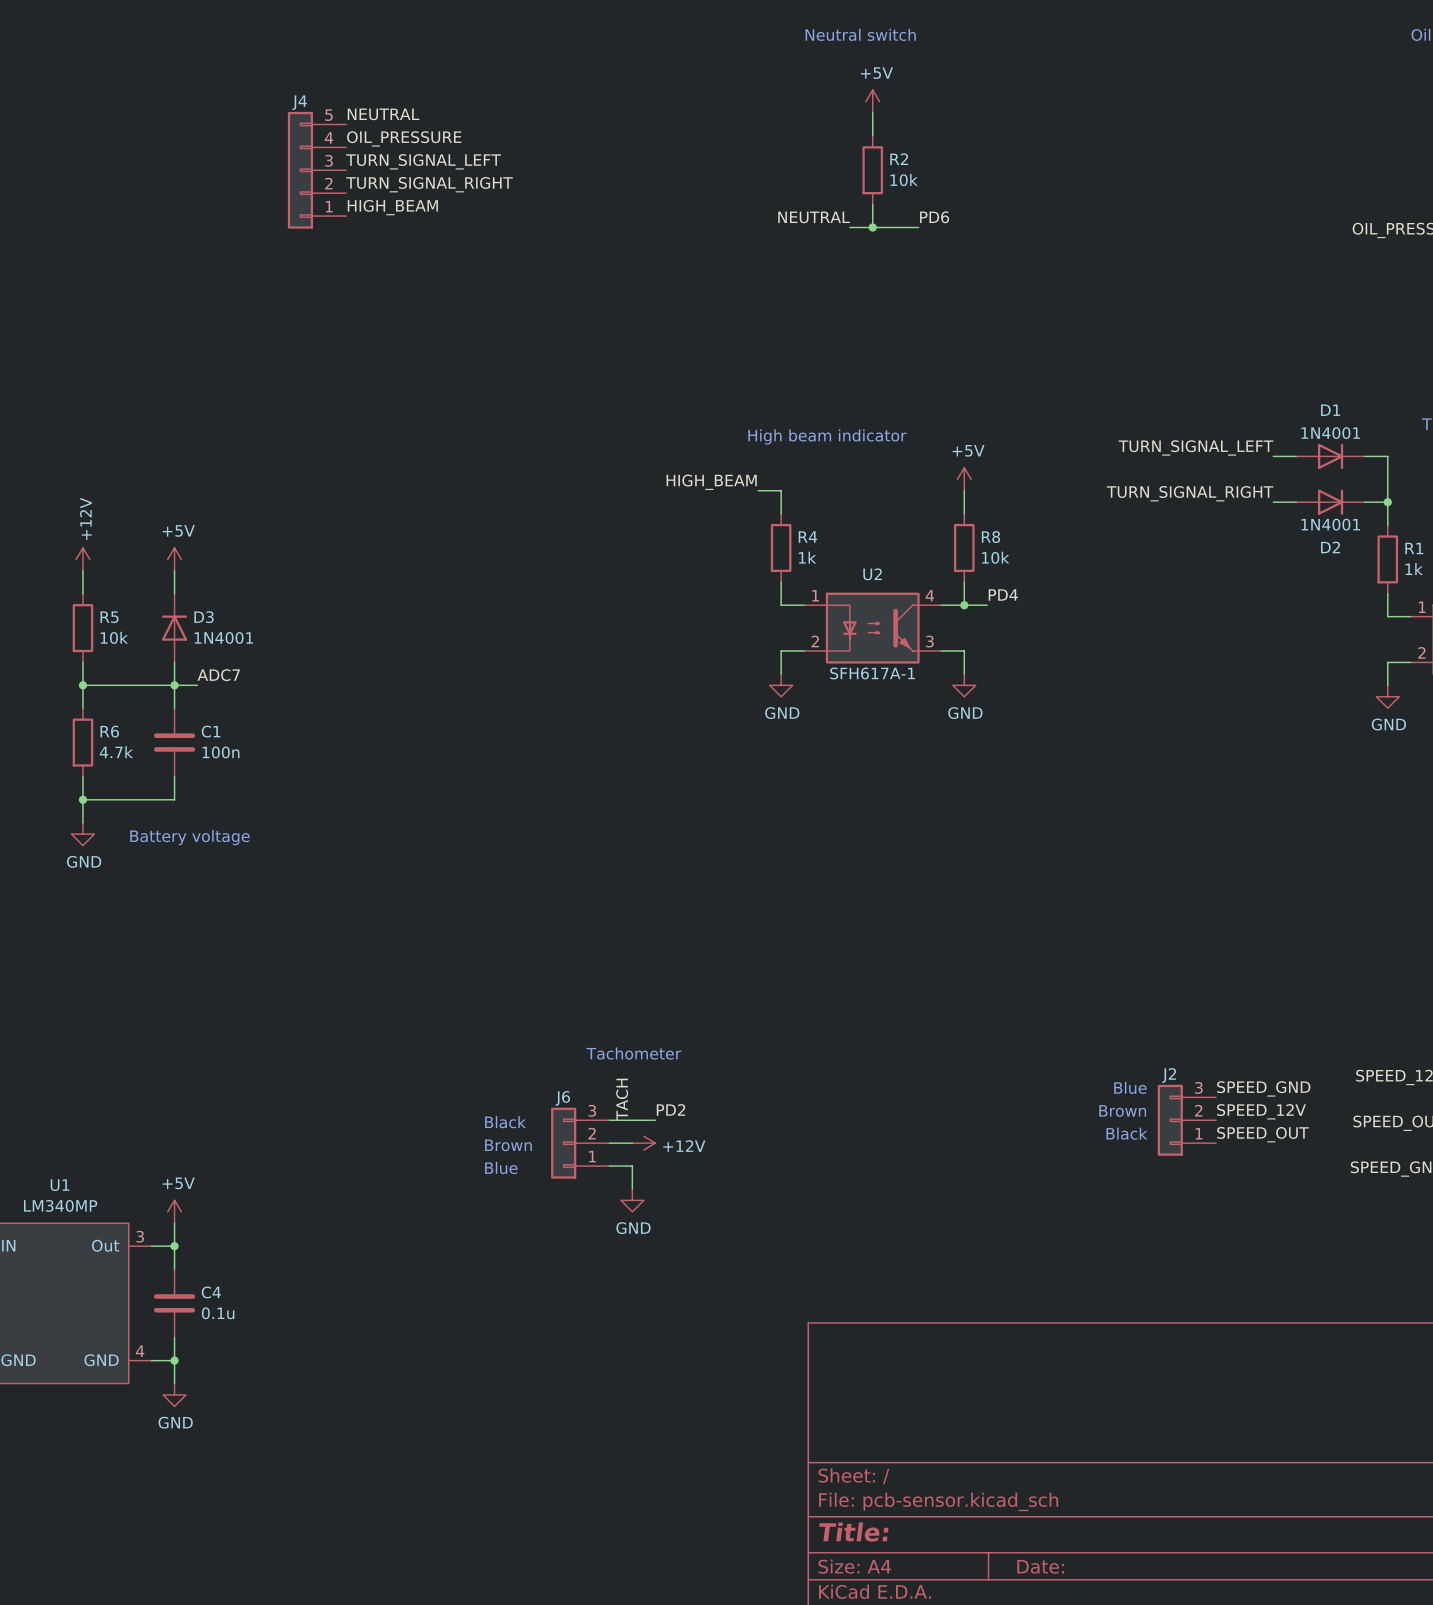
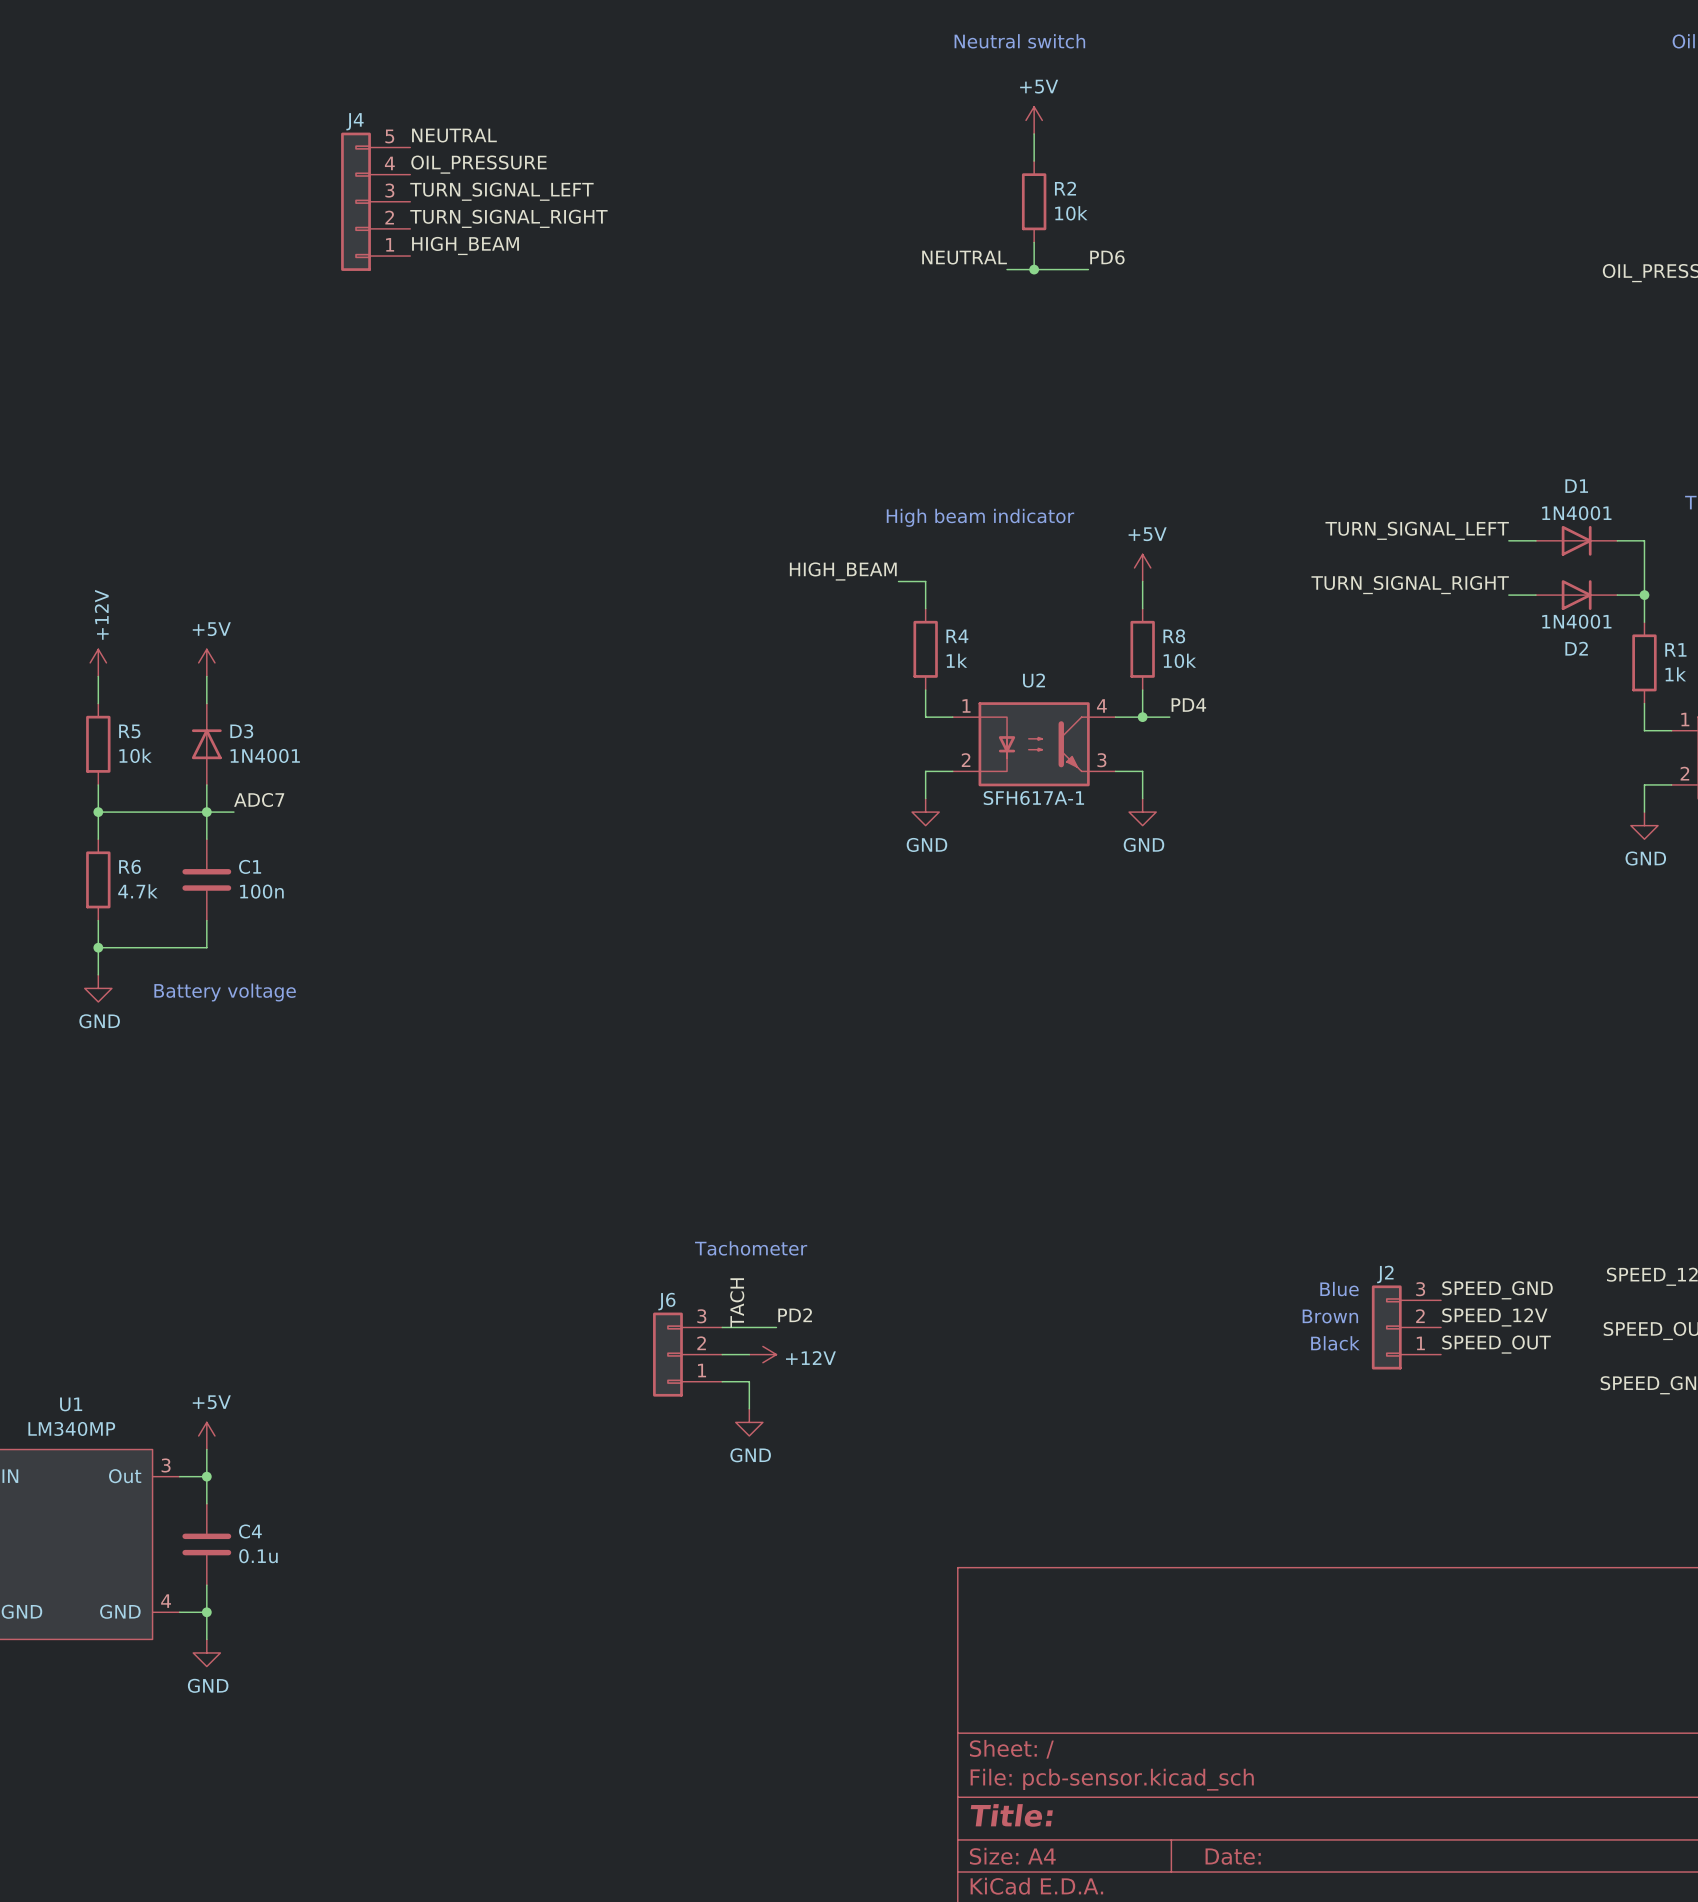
text: Black (505, 1122) -> none
text: Brown (508, 1145) -> none
text: Blue (501, 1167) -> none

